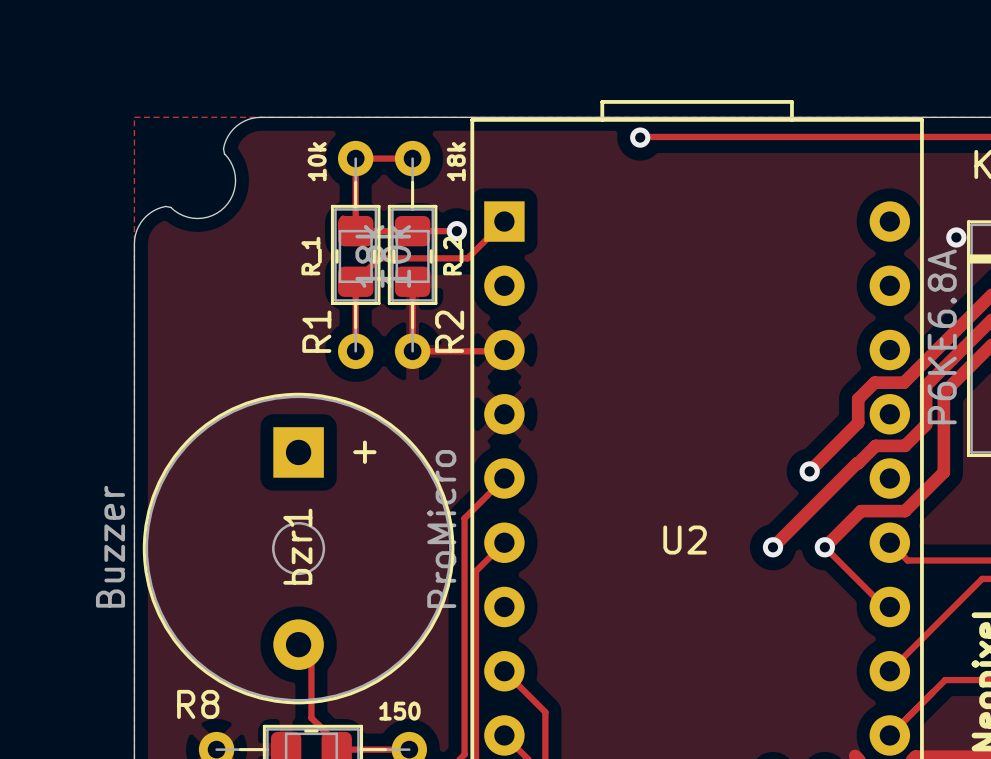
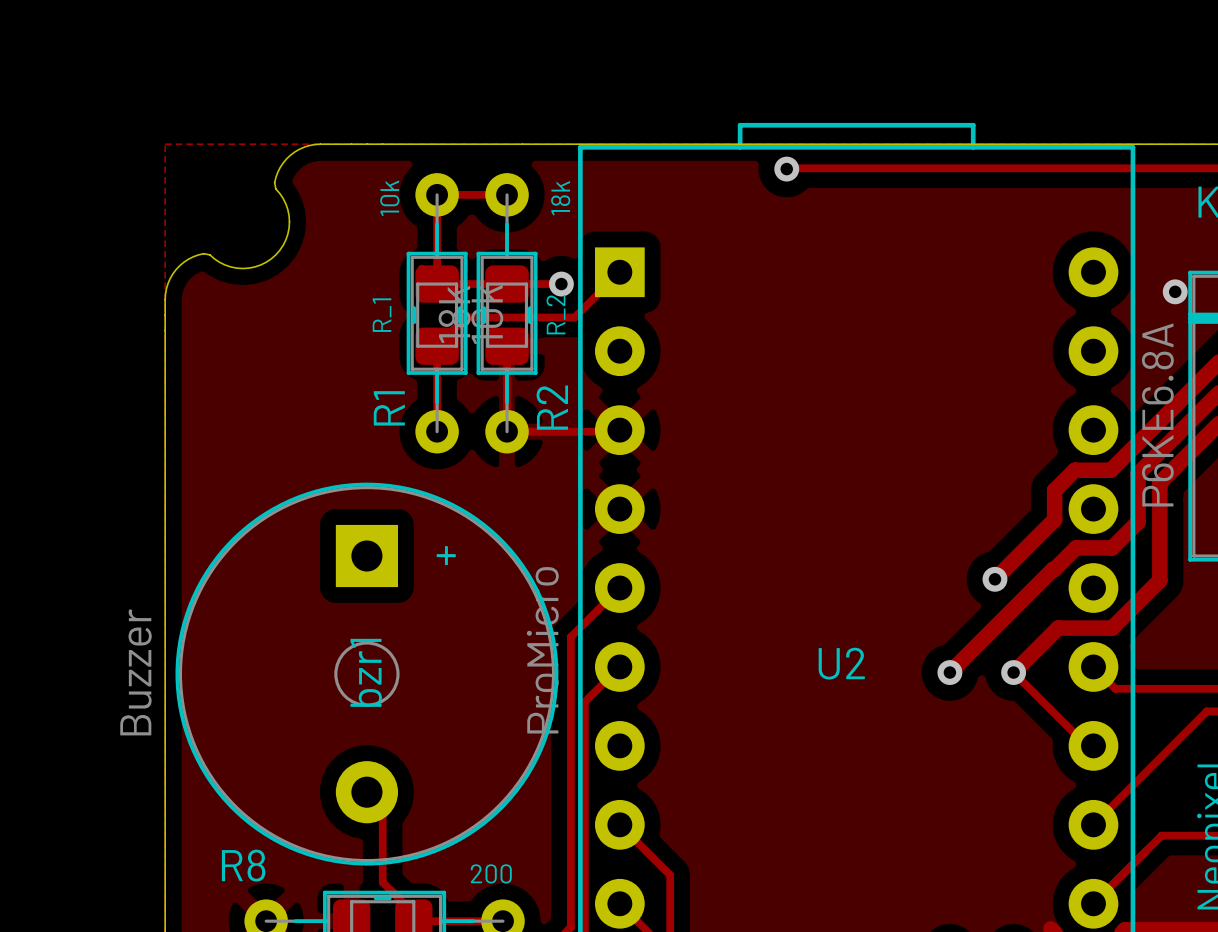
R8 value: 150 (399, 711) -> 200 (491, 873)

